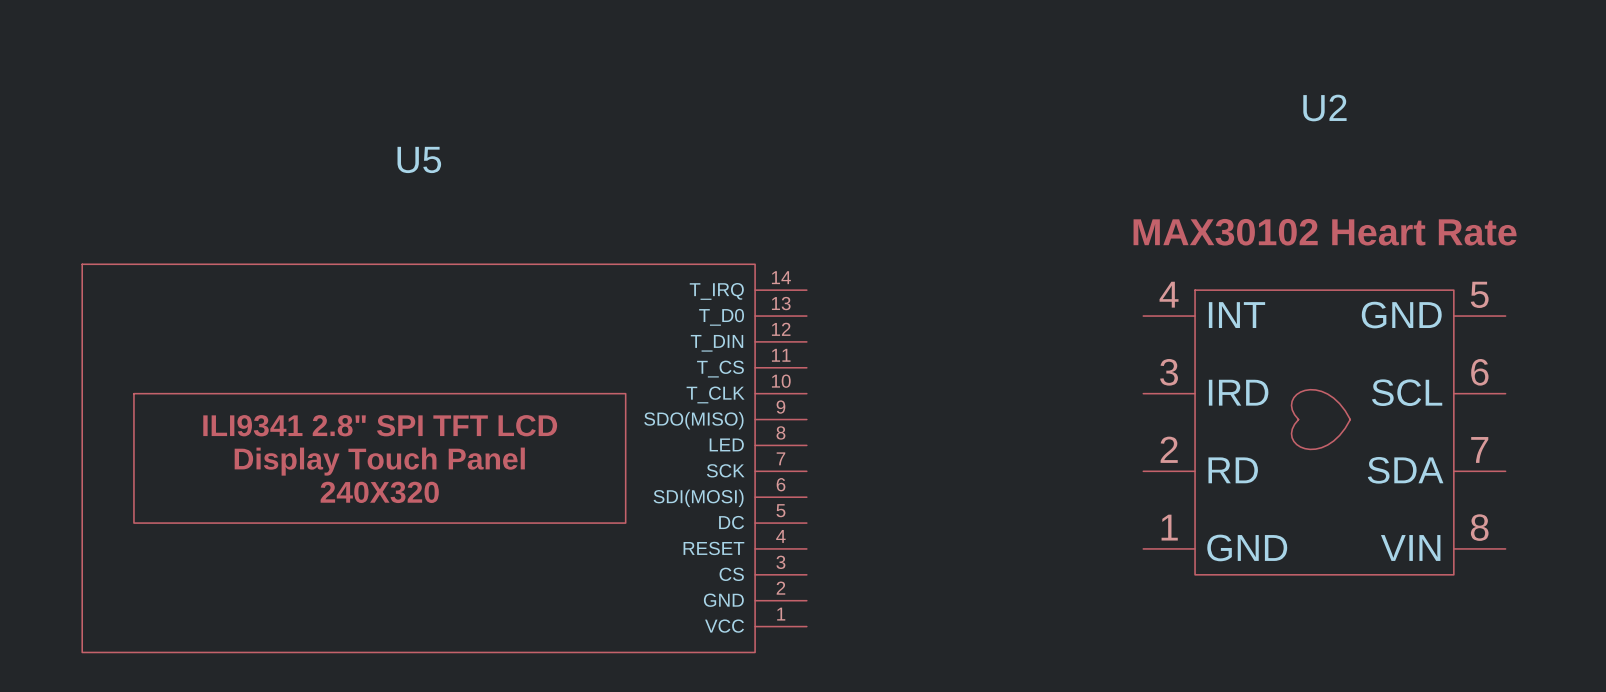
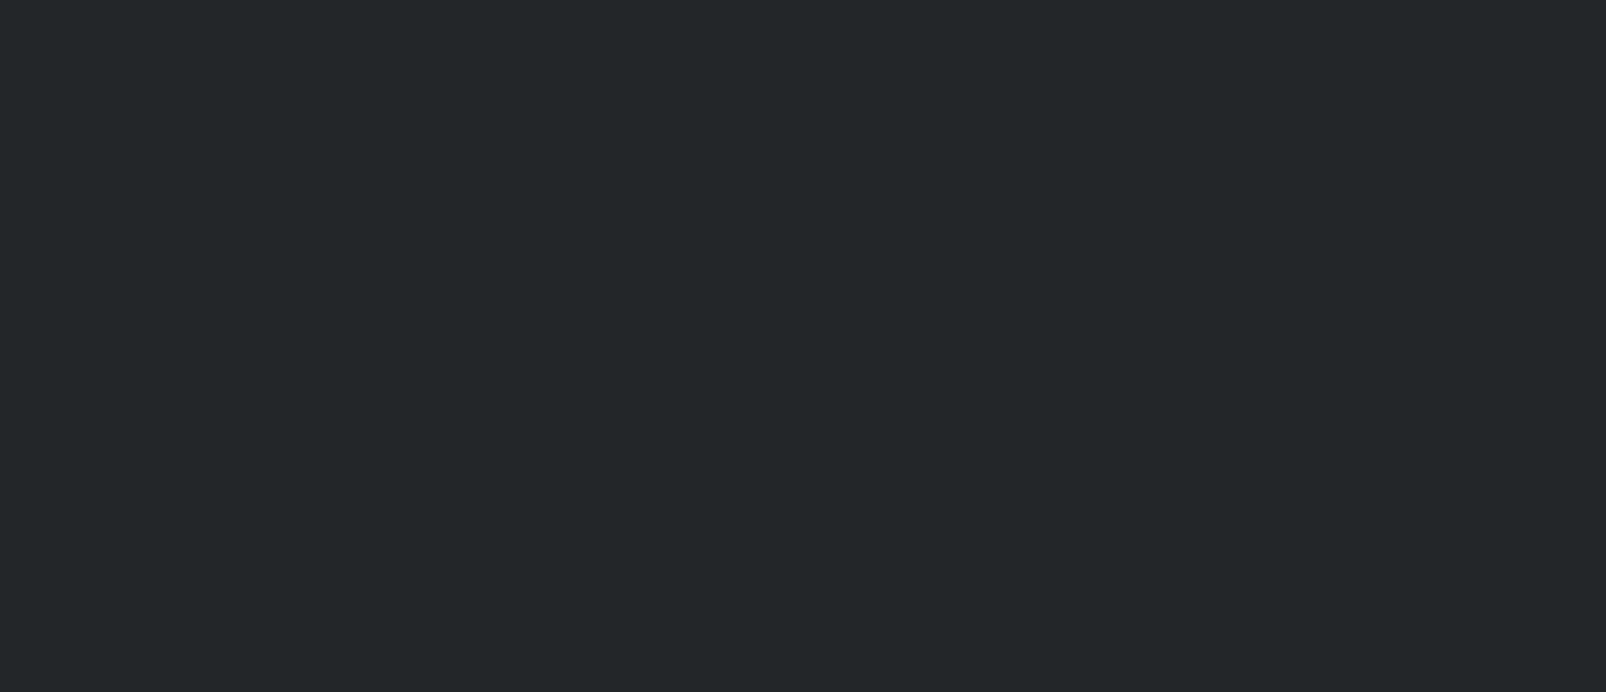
U2: (1324, 432) -> none
U5: (444, 458) -> none

